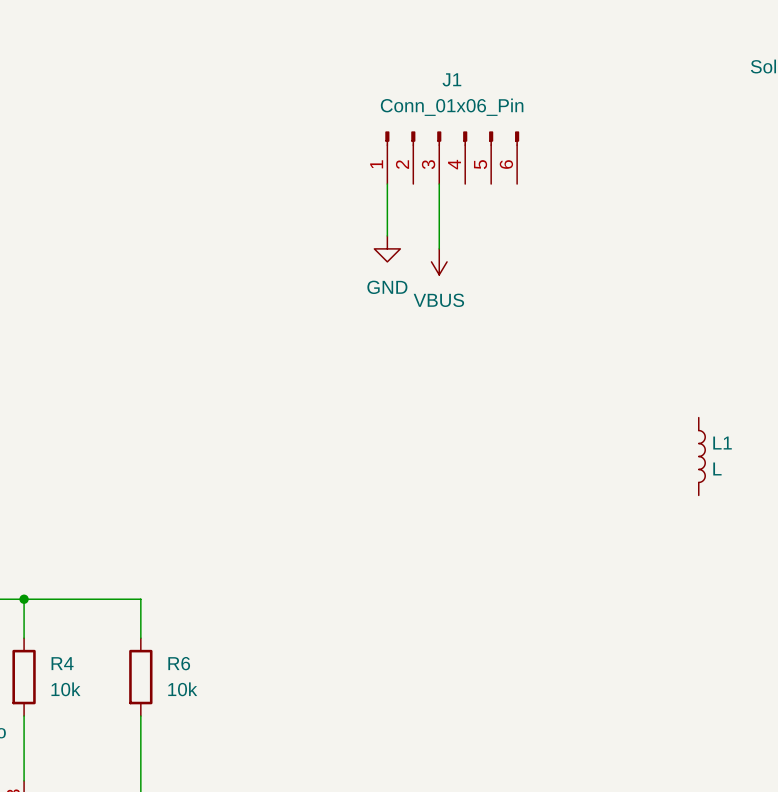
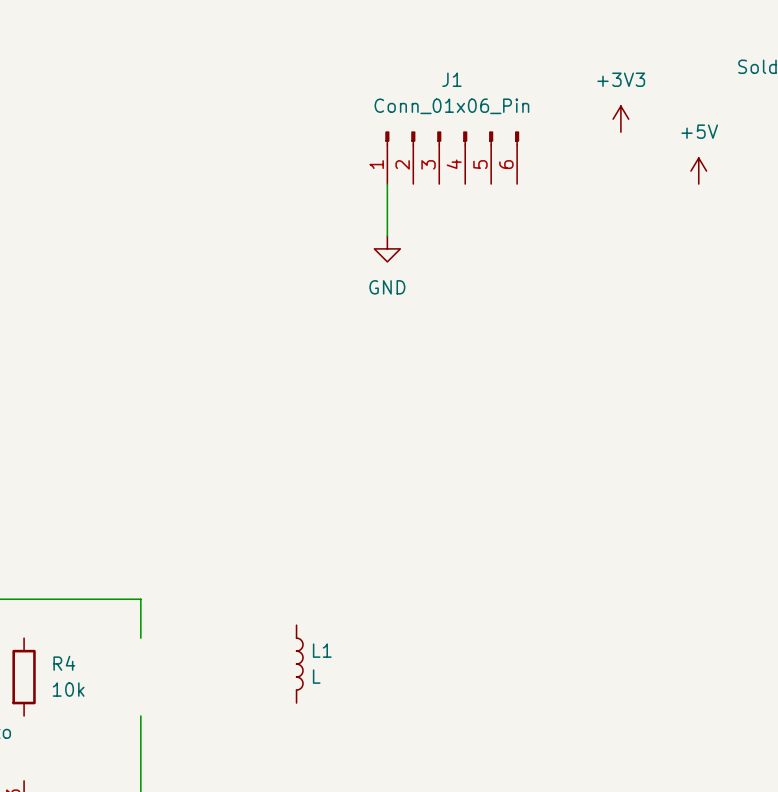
power symbol: none -> +3V3 (620, 119)
power symbol: none -> +5V (698, 171)
wire: (439, 184) (439, 248) -> none
power symbol: VBUS (439, 261) -> none
L1 position: (701, 456) -> (299, 664)
wire: (24, 599) (24, 638) -> none
junction: (24, 599) -> none
R6: 10k (140, 677) -> none
wire: (24, 716) (24, 780) -> none

